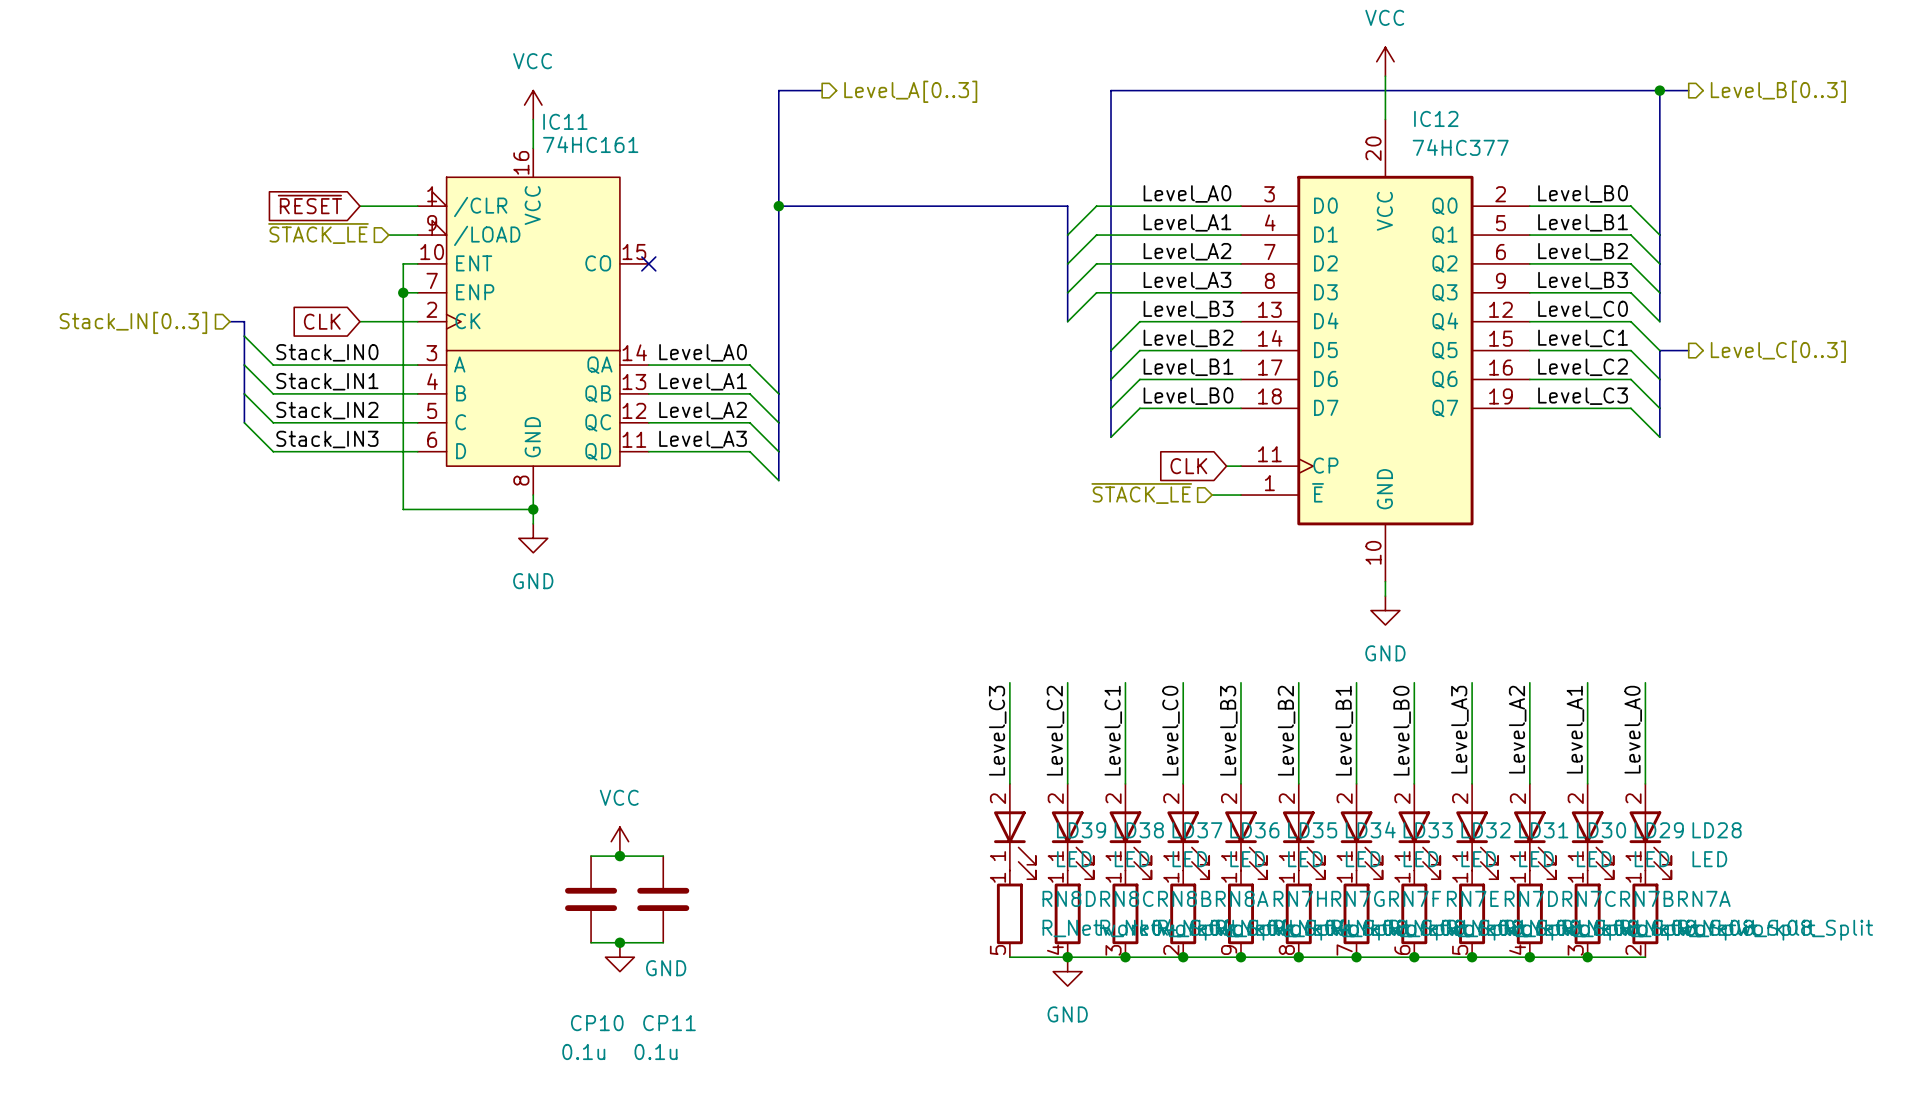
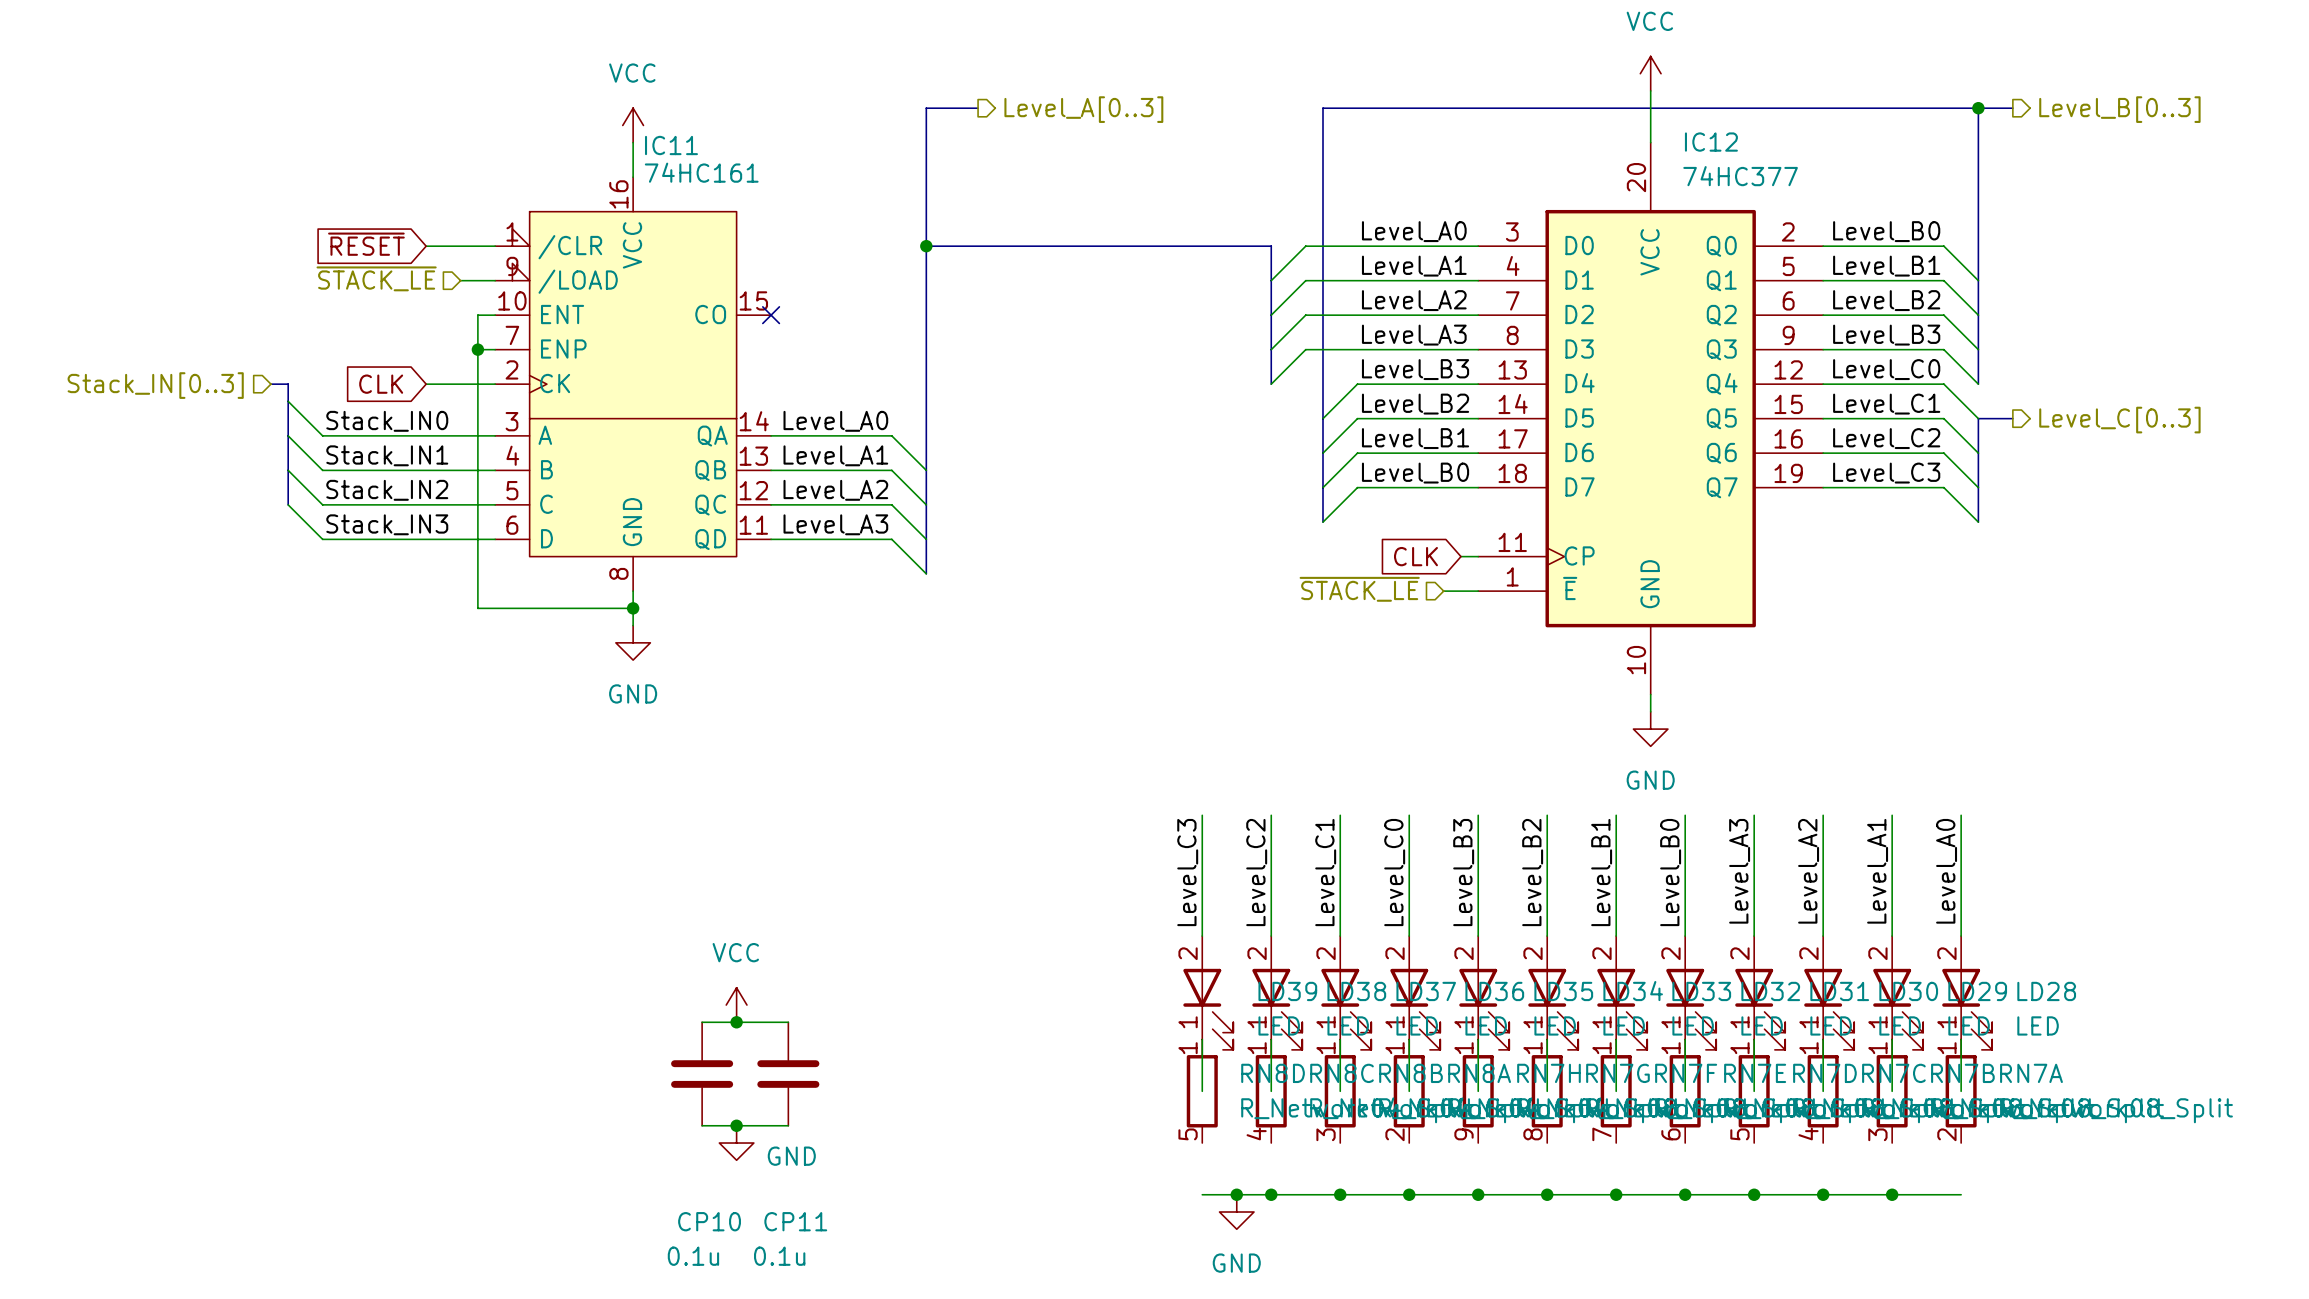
wire: none -> (1202, 1039) (1202, 1091)
wire: none -> (1271, 1039) (1271, 1091)
wire: none -> (1340, 1039) (1340, 1091)
wire: none -> (1409, 1039) (1409, 1091)
wire: none -> (1478, 1039) (1478, 1091)
wire: none -> (1547, 1039) (1547, 1091)
wire: none -> (1616, 1039) (1616, 1091)
wire: none -> (1685, 1039) (1685, 1091)
wire: none -> (1754, 1039) (1754, 1091)
wire: none -> (1823, 1039) (1823, 1091)
wire: none -> (1892, 1039) (1892, 1091)
wire: none -> (1961, 1039) (1961, 1091)
wire: (1009, 957) (1645, 957) -> (1202, 1194) (1961, 1194)
junction: (1067, 957) -> none
junction: (1125, 957) -> none
junction: (1183, 957) -> none
junction: (1240, 957) -> none
junction: (1298, 957) -> none
junction: (1356, 957) -> none
junction: (1414, 957) -> none
junction: (1472, 957) -> none
junction: (1529, 957) -> none
junction: (1587, 957) -> none
power symbol position: GND (1067, 971) -> GND (1236, 1212)
junction: none -> (1236, 1194)
junction: none -> (1271, 1194)
junction: none -> (1340, 1194)
junction: none -> (1409, 1194)
junction: none -> (1478, 1194)
junction: none -> (1547, 1194)
junction: none -> (1616, 1194)
junction: none -> (1685, 1194)
junction: none -> (1754, 1194)
junction: none -> (1823, 1194)
junction: none -> (1892, 1194)

